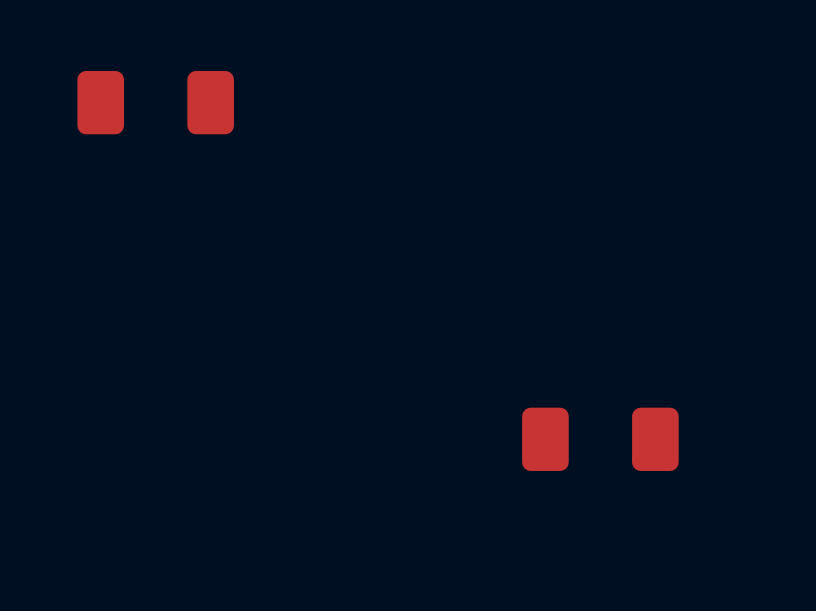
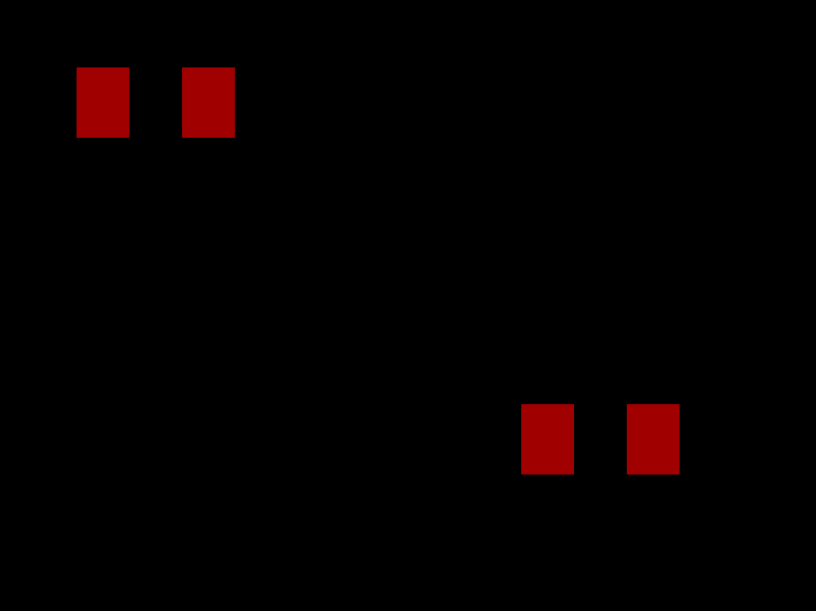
part footprint: [77, 70, 234, 135] -> [76, 67, 235, 138]
part footprint: [522, 407, 679, 471] -> [521, 404, 680, 475]

